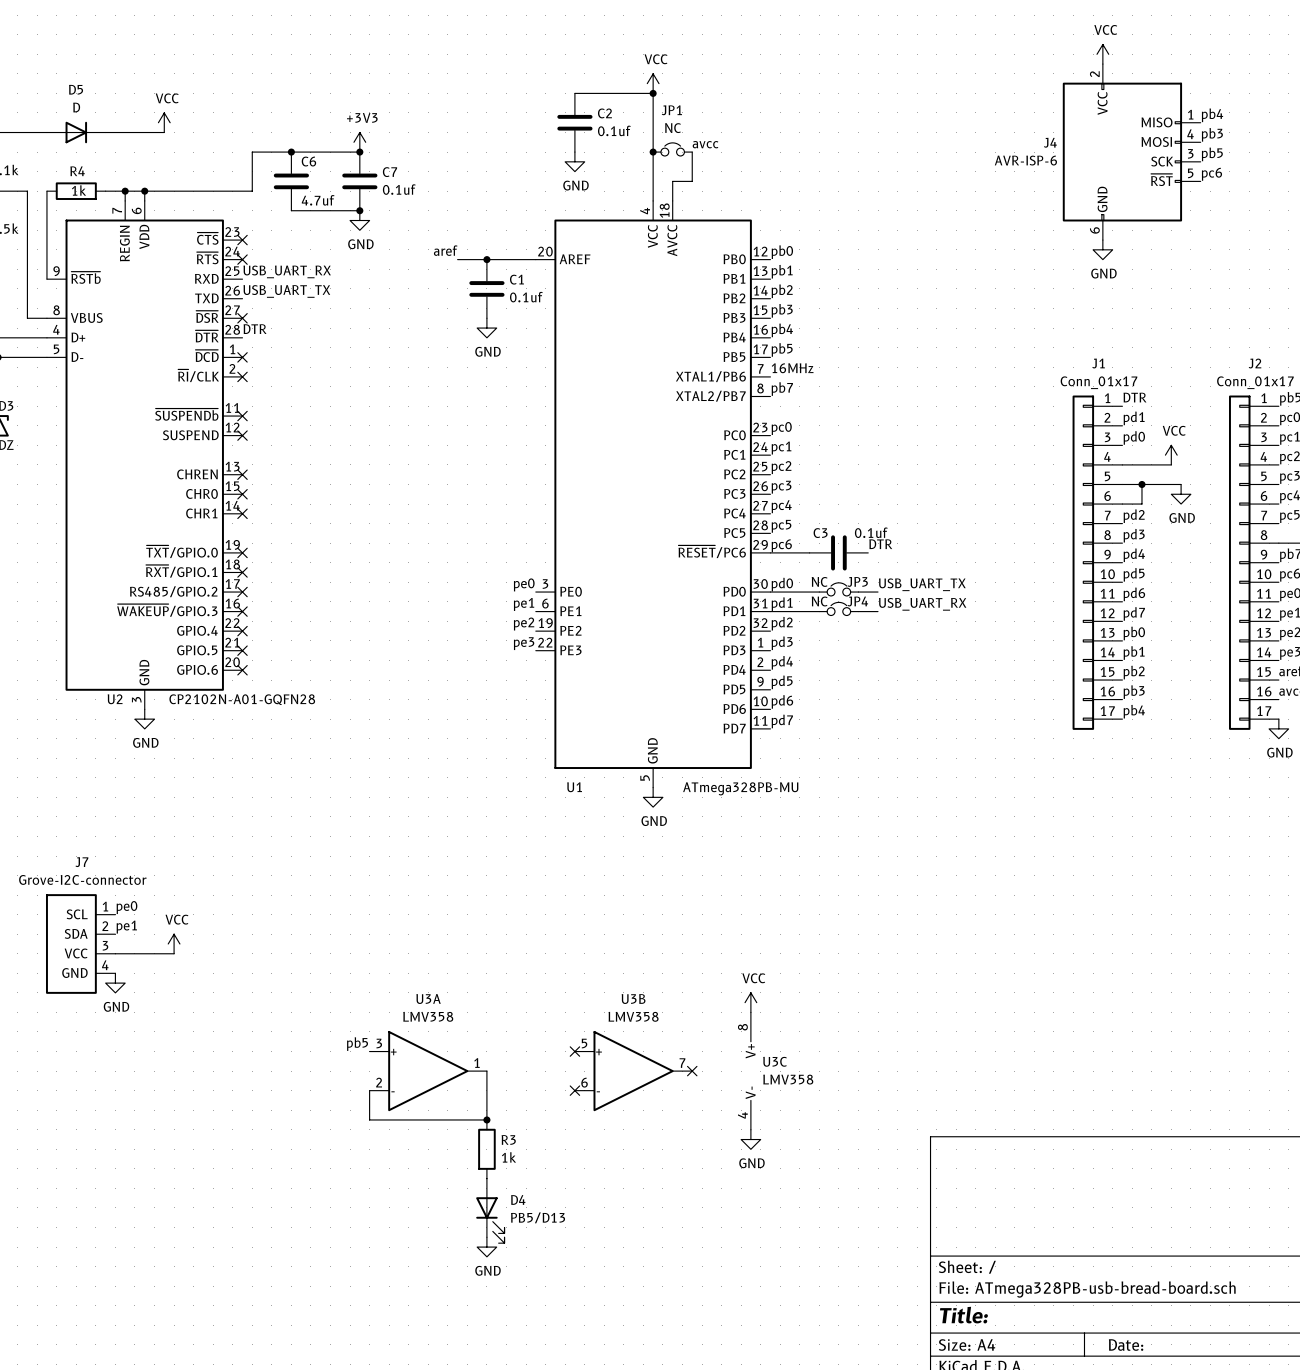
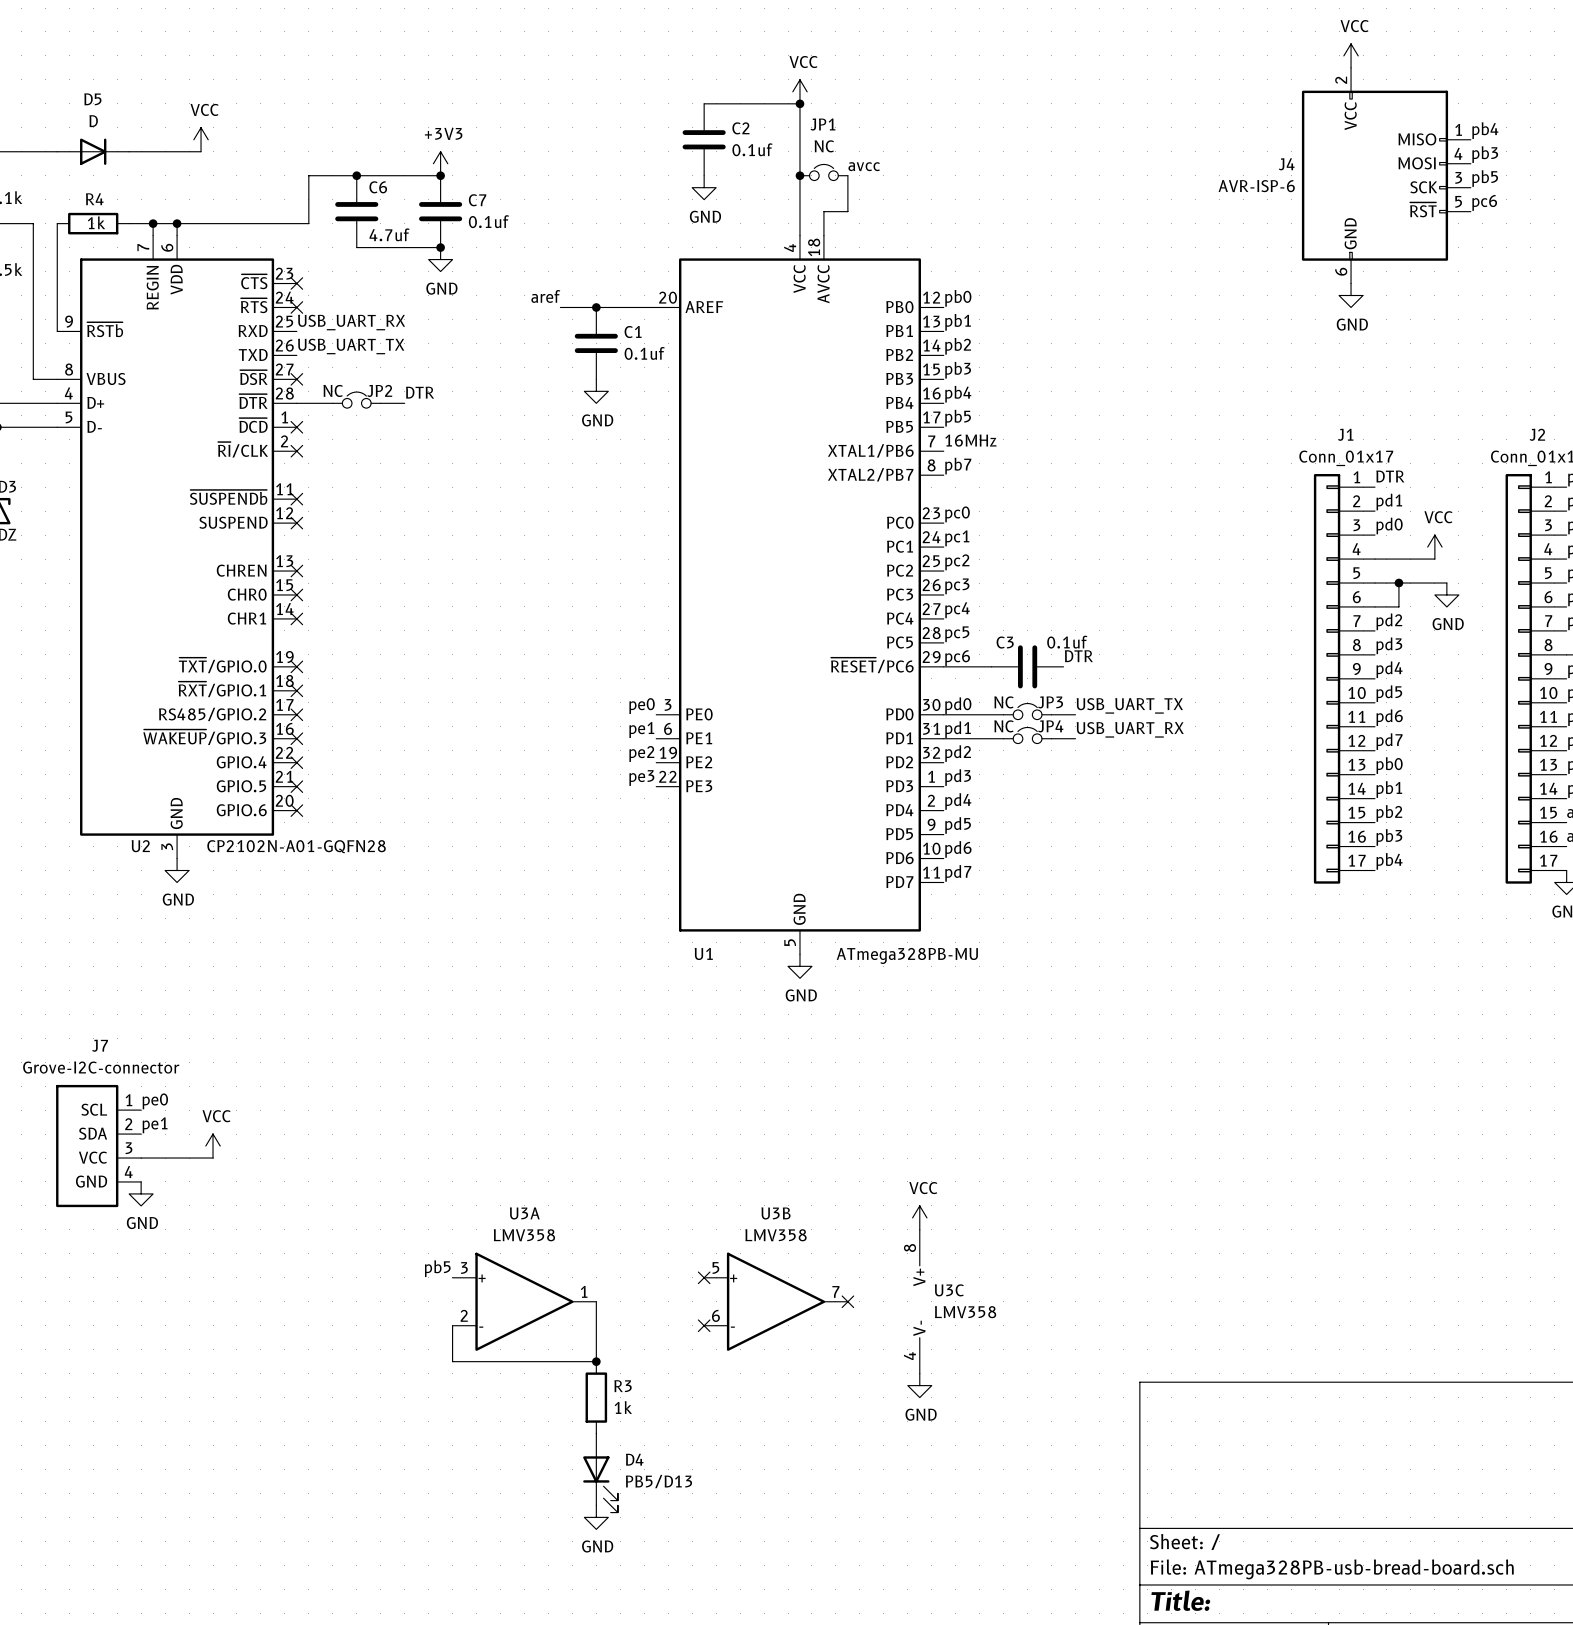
label position: DTR (255, 329) -> DTR (420, 392)
JP2: none -> NC (356, 400)
wire: none -> (296, 403) (332, 403)
wire: none -> (380, 403) (404, 403)

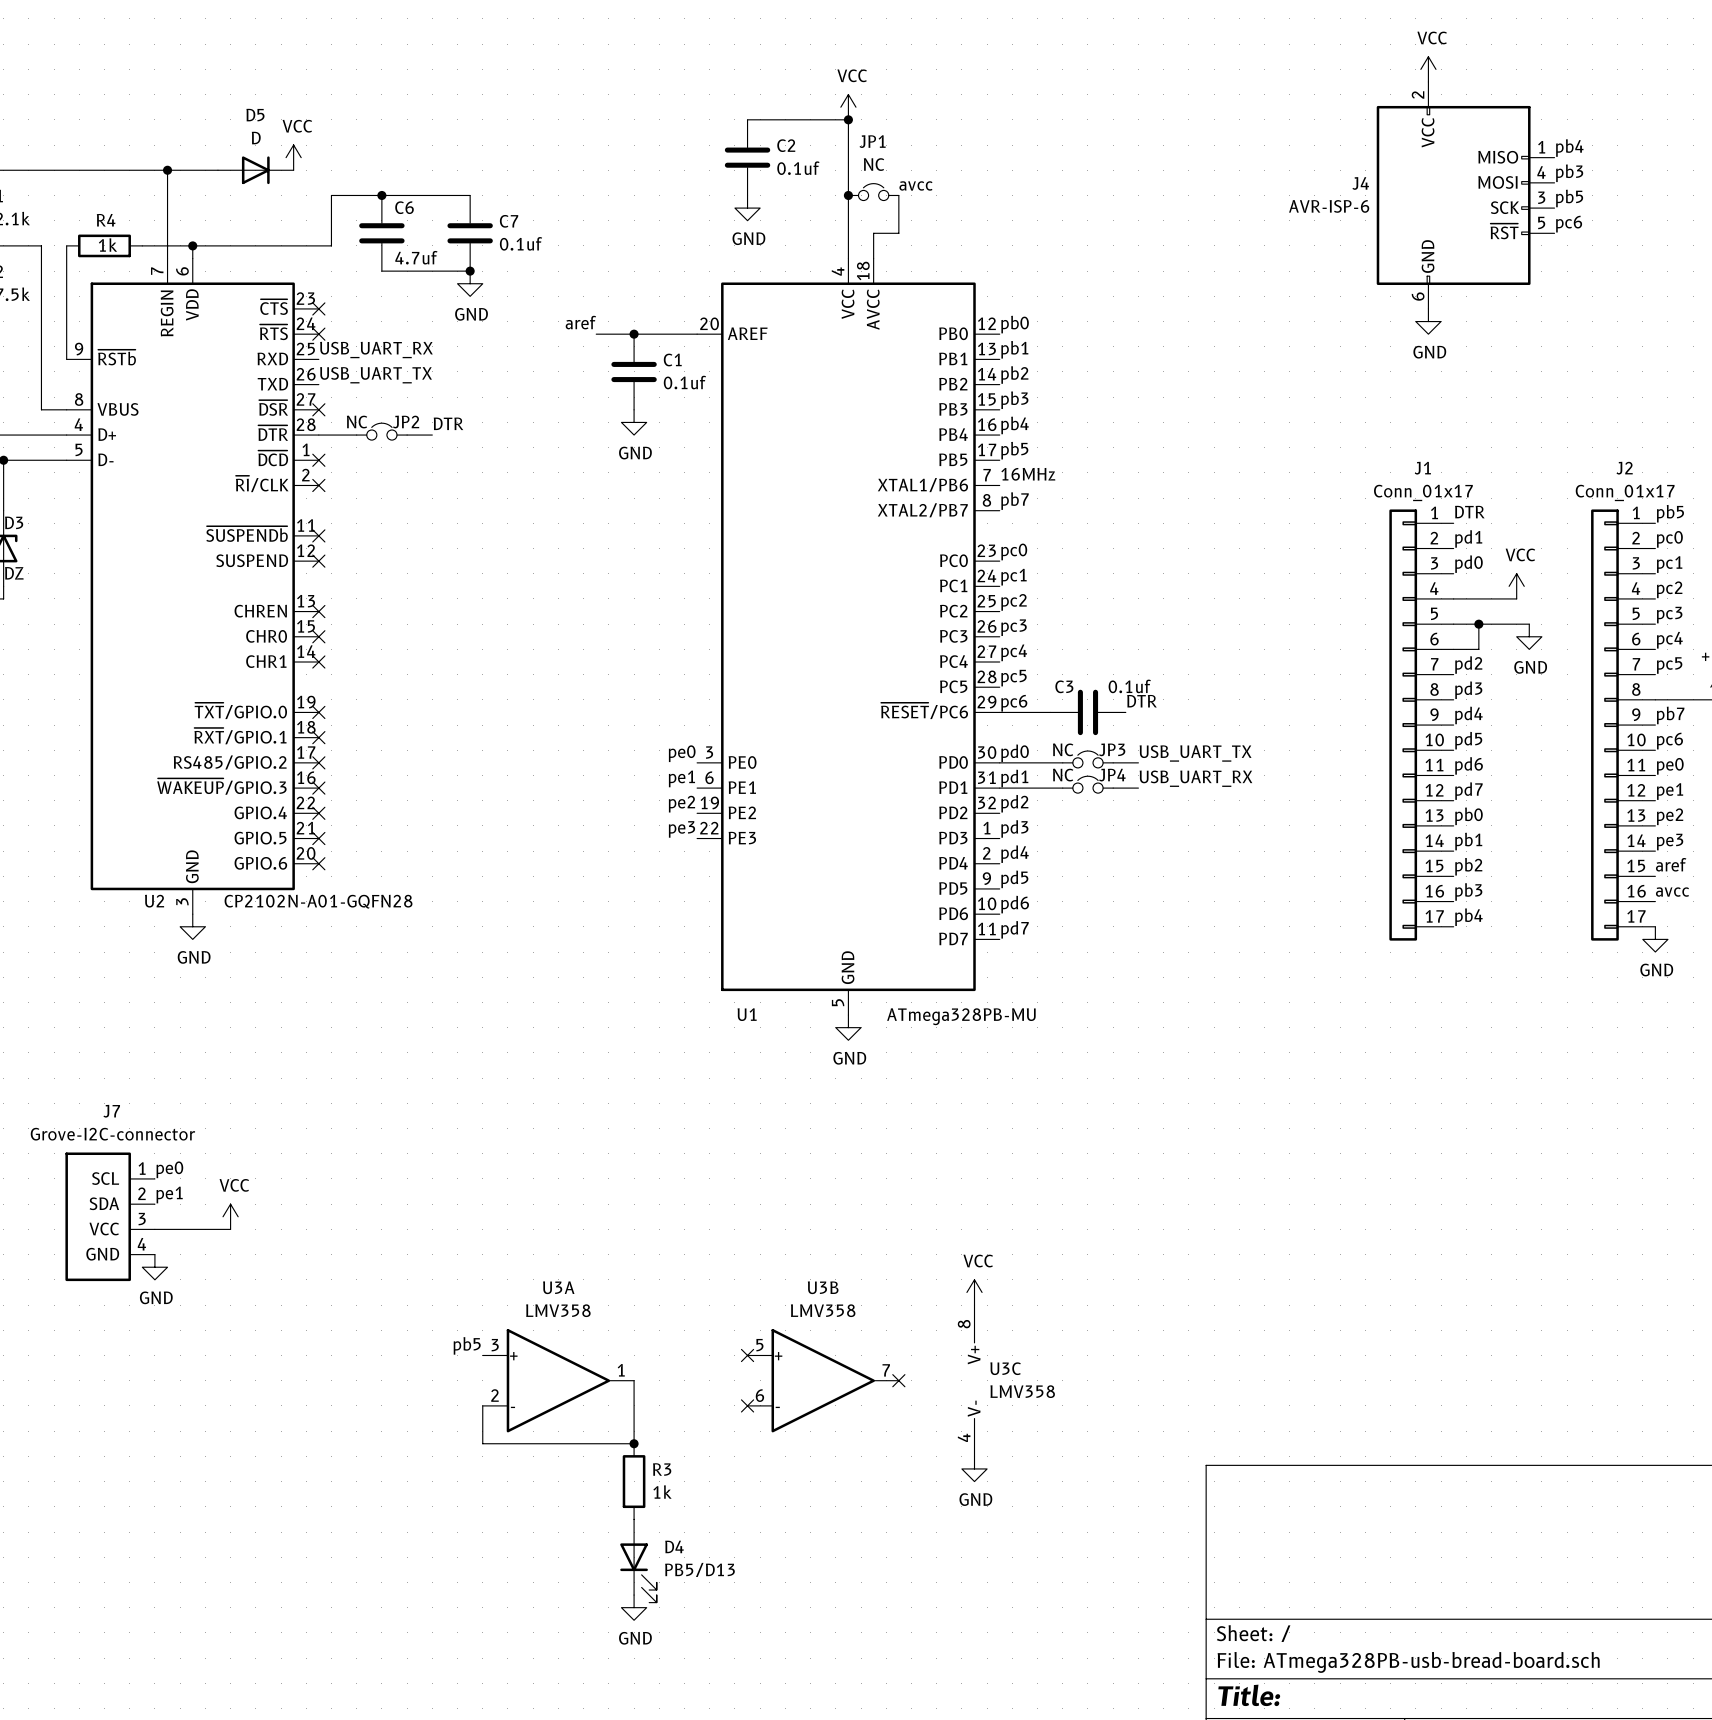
power symbol position: VCC (201, 139) -> VCC (293, 157)
D5 position: (93, 151) -> (255, 170)
wire: none -> (167, 170) (167, 245)
junction: none -> (167, 170)
power symbol: +3V3 (440, 163) -> none
junction: (440, 175) -> none
junction: (153, 223) -> none

